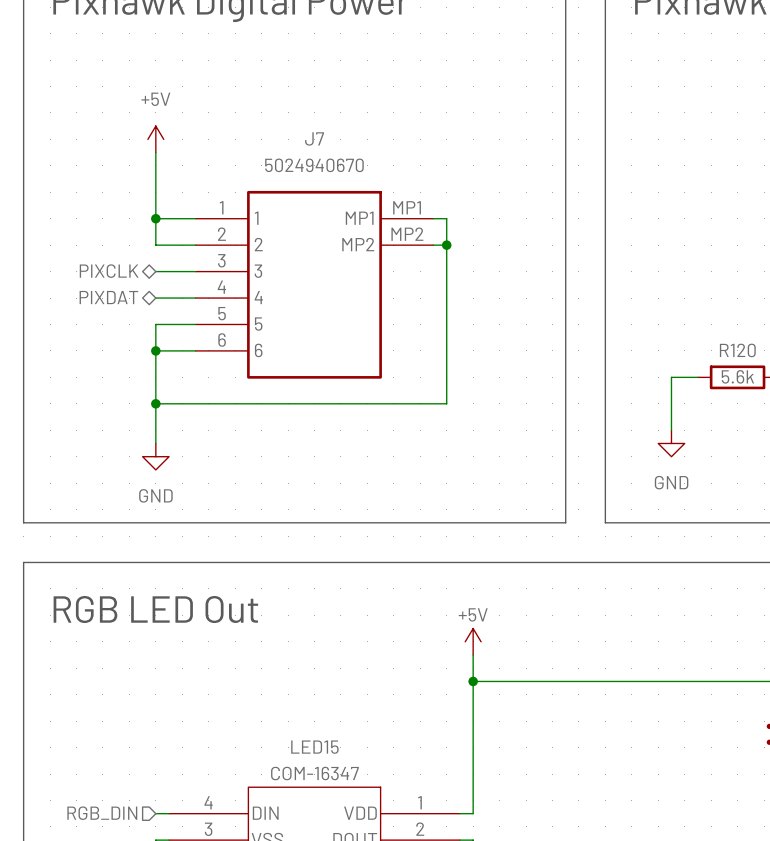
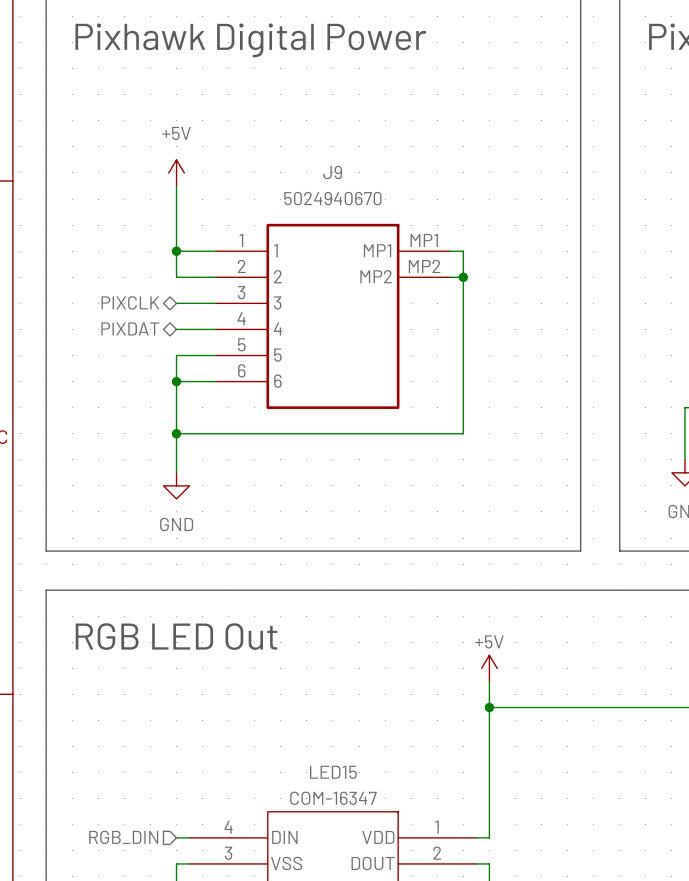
J7 name: J7 (314, 138) -> J9 (332, 172)

